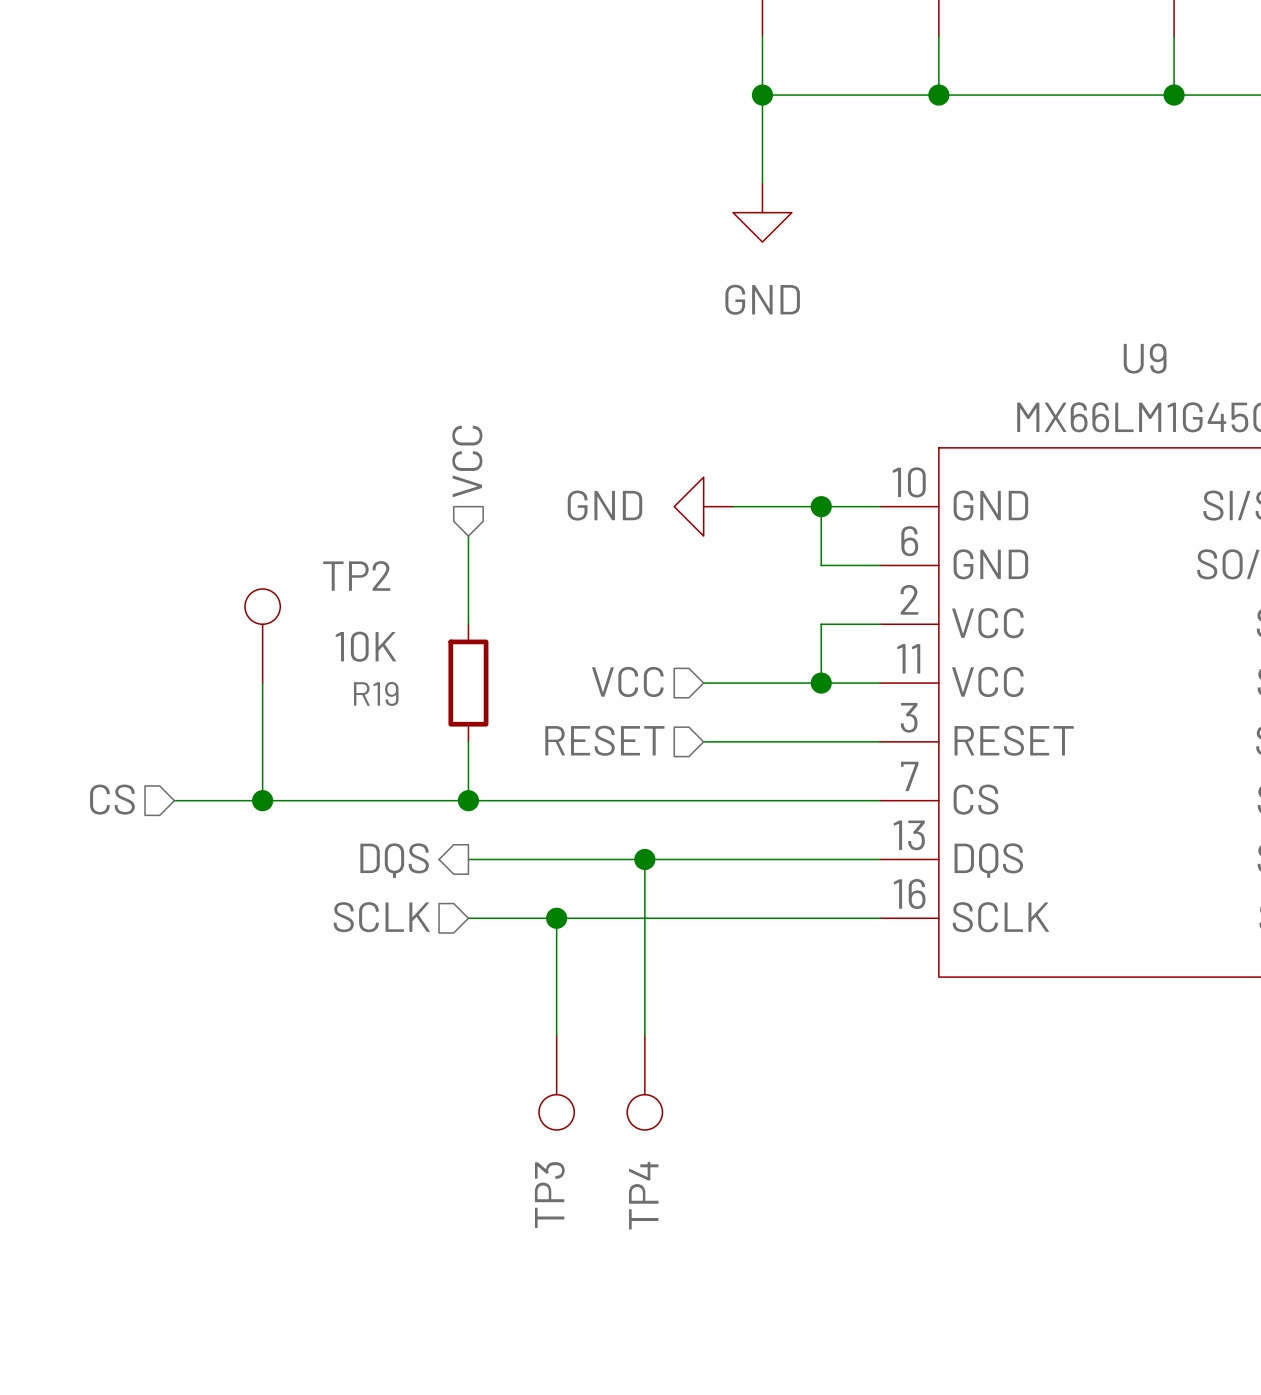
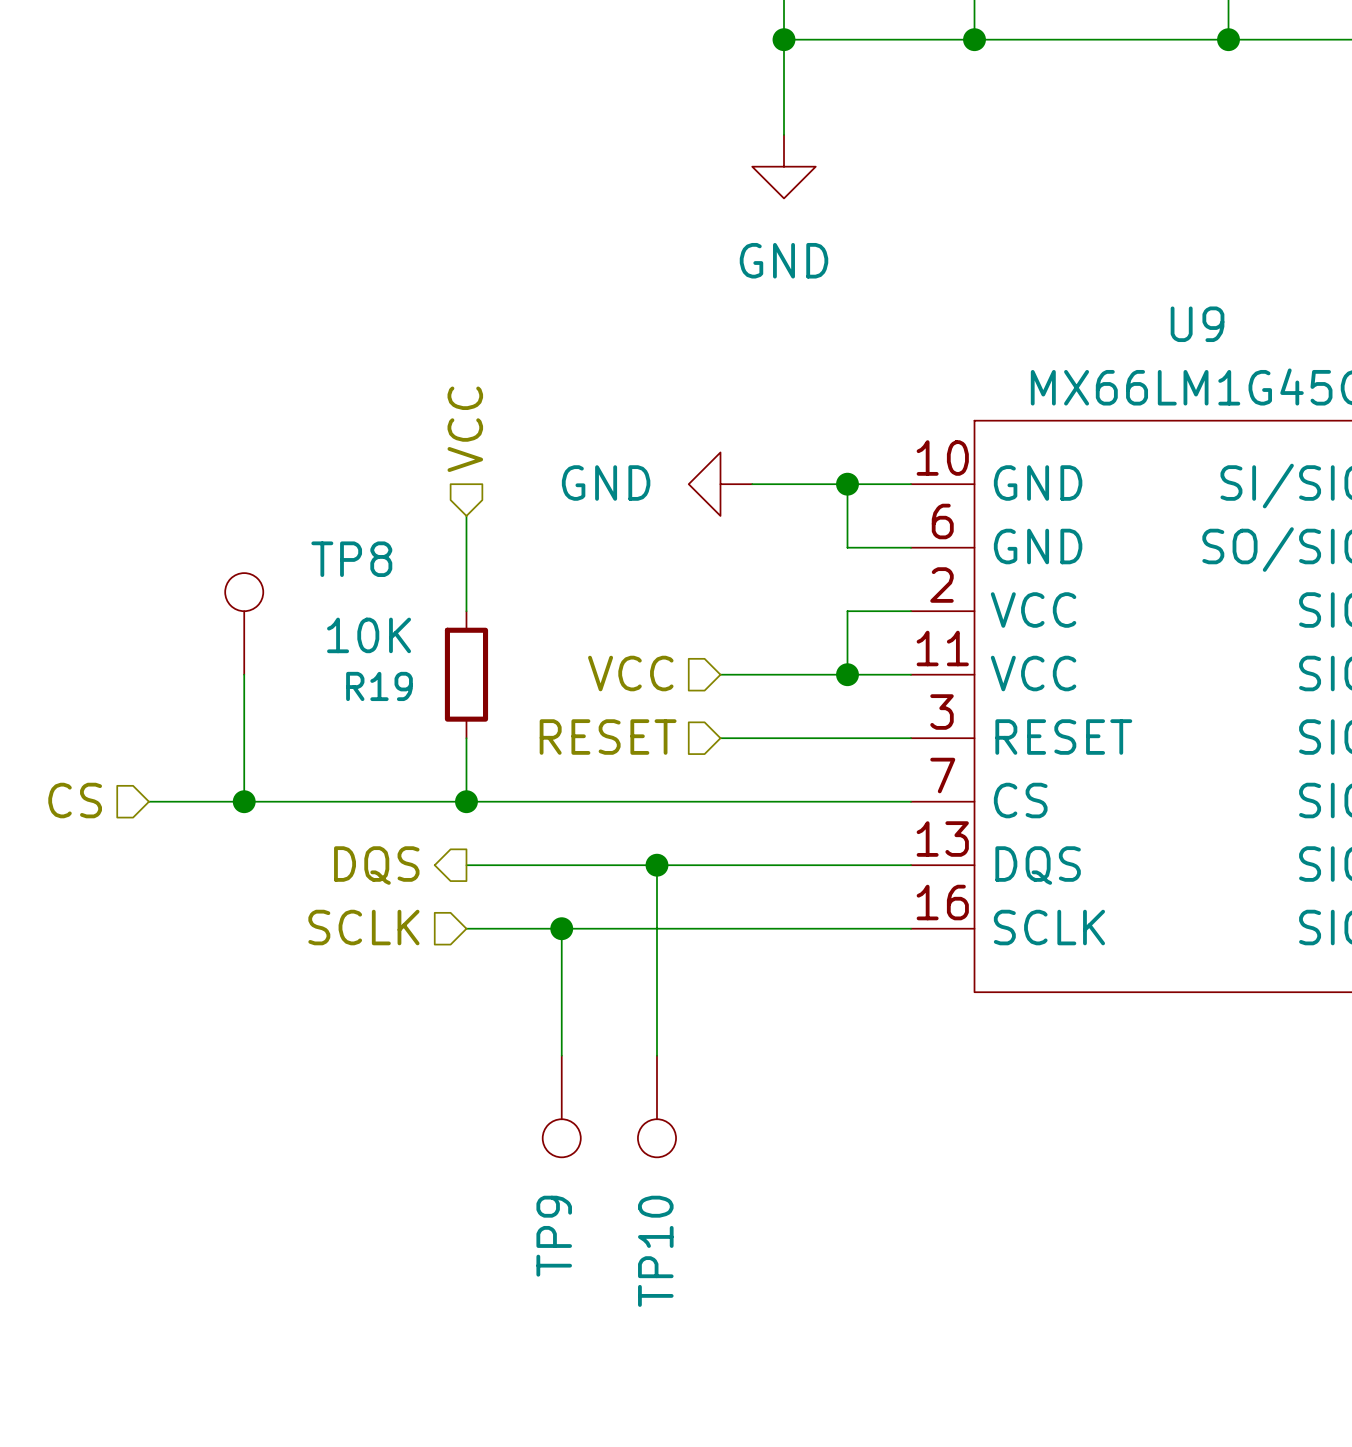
TP2 name: TP2 (356, 575) -> TP8 (351, 559)
TP3 name: TP3 (549, 1195) -> TP9 (554, 1236)
TP4 name: TP4 (643, 1195) -> TP10 (655, 1251)

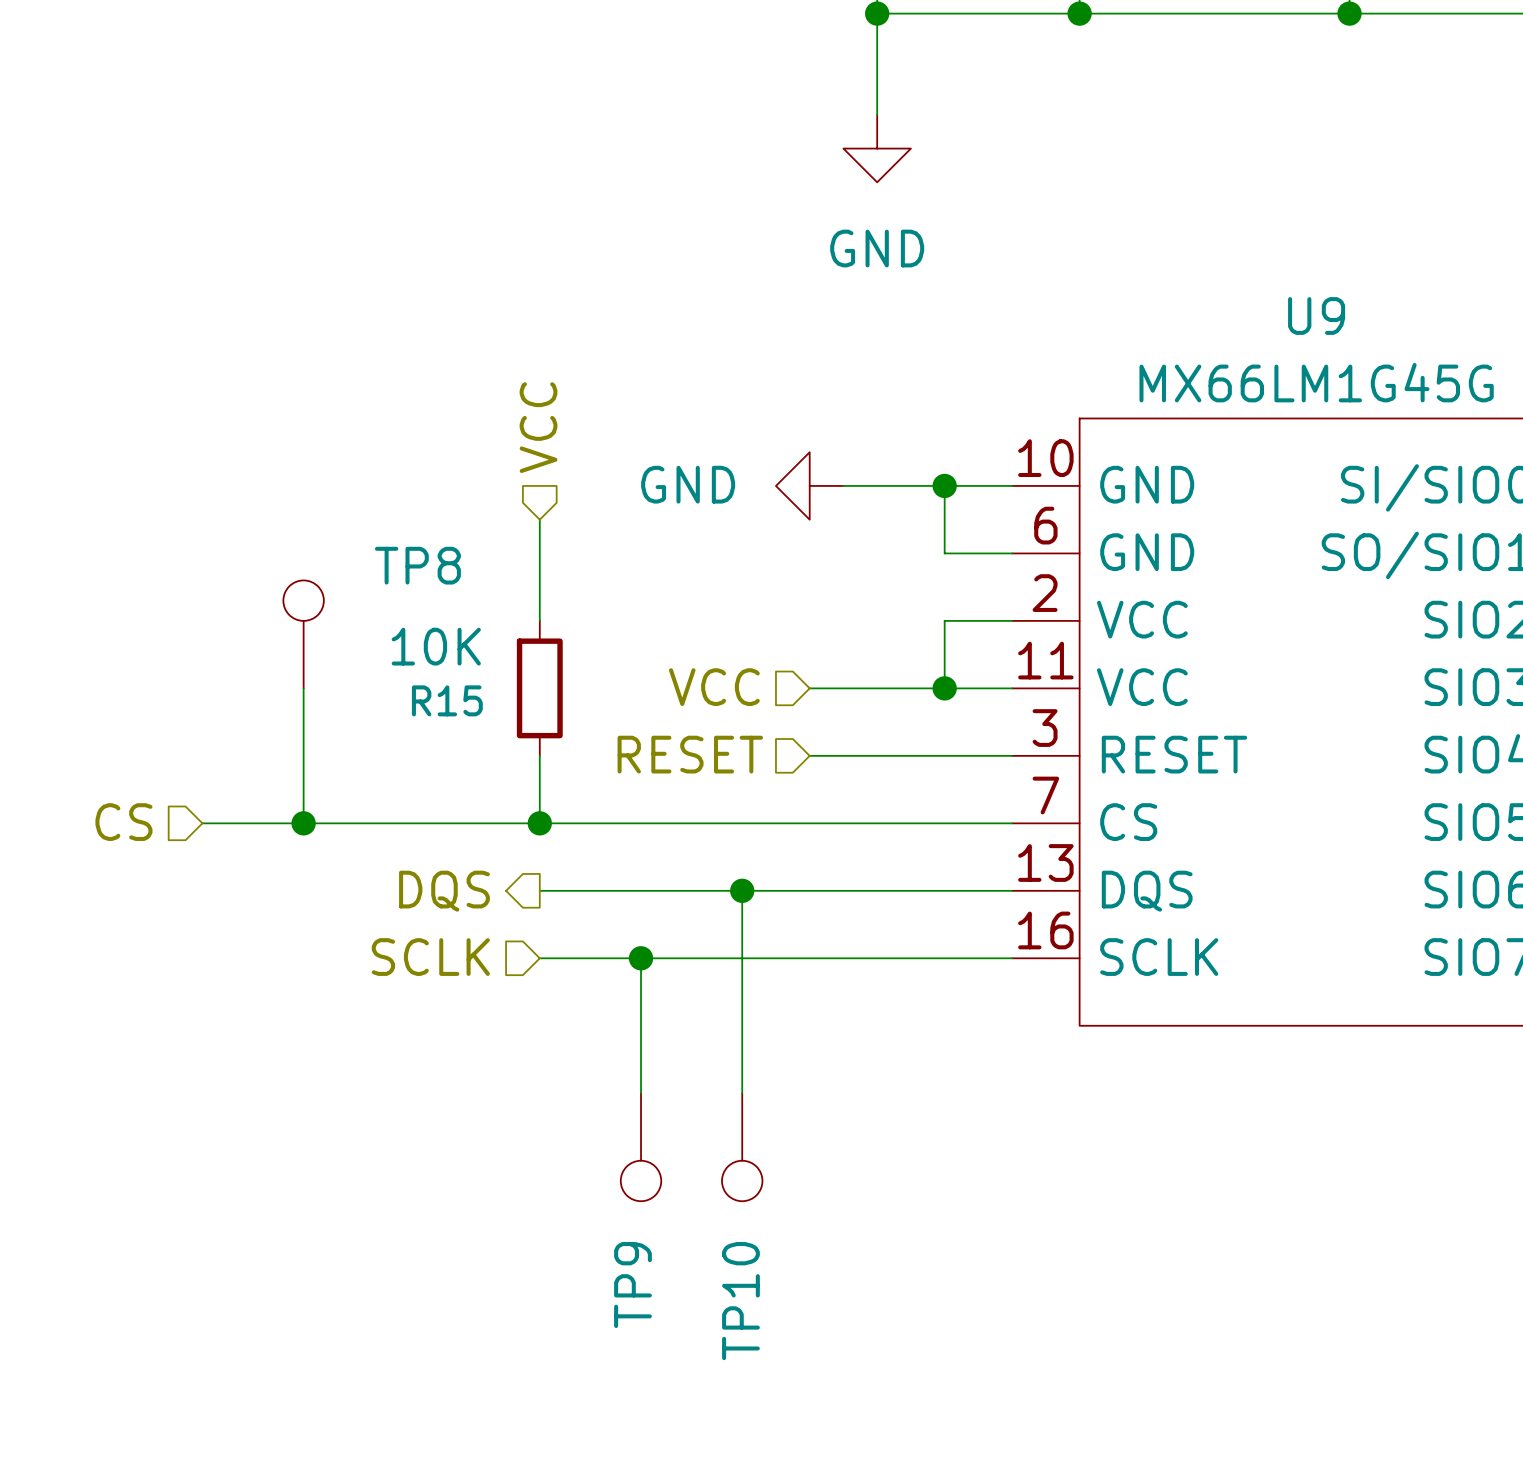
R19 name: R19 (379, 686) -> R15 (447, 700)

